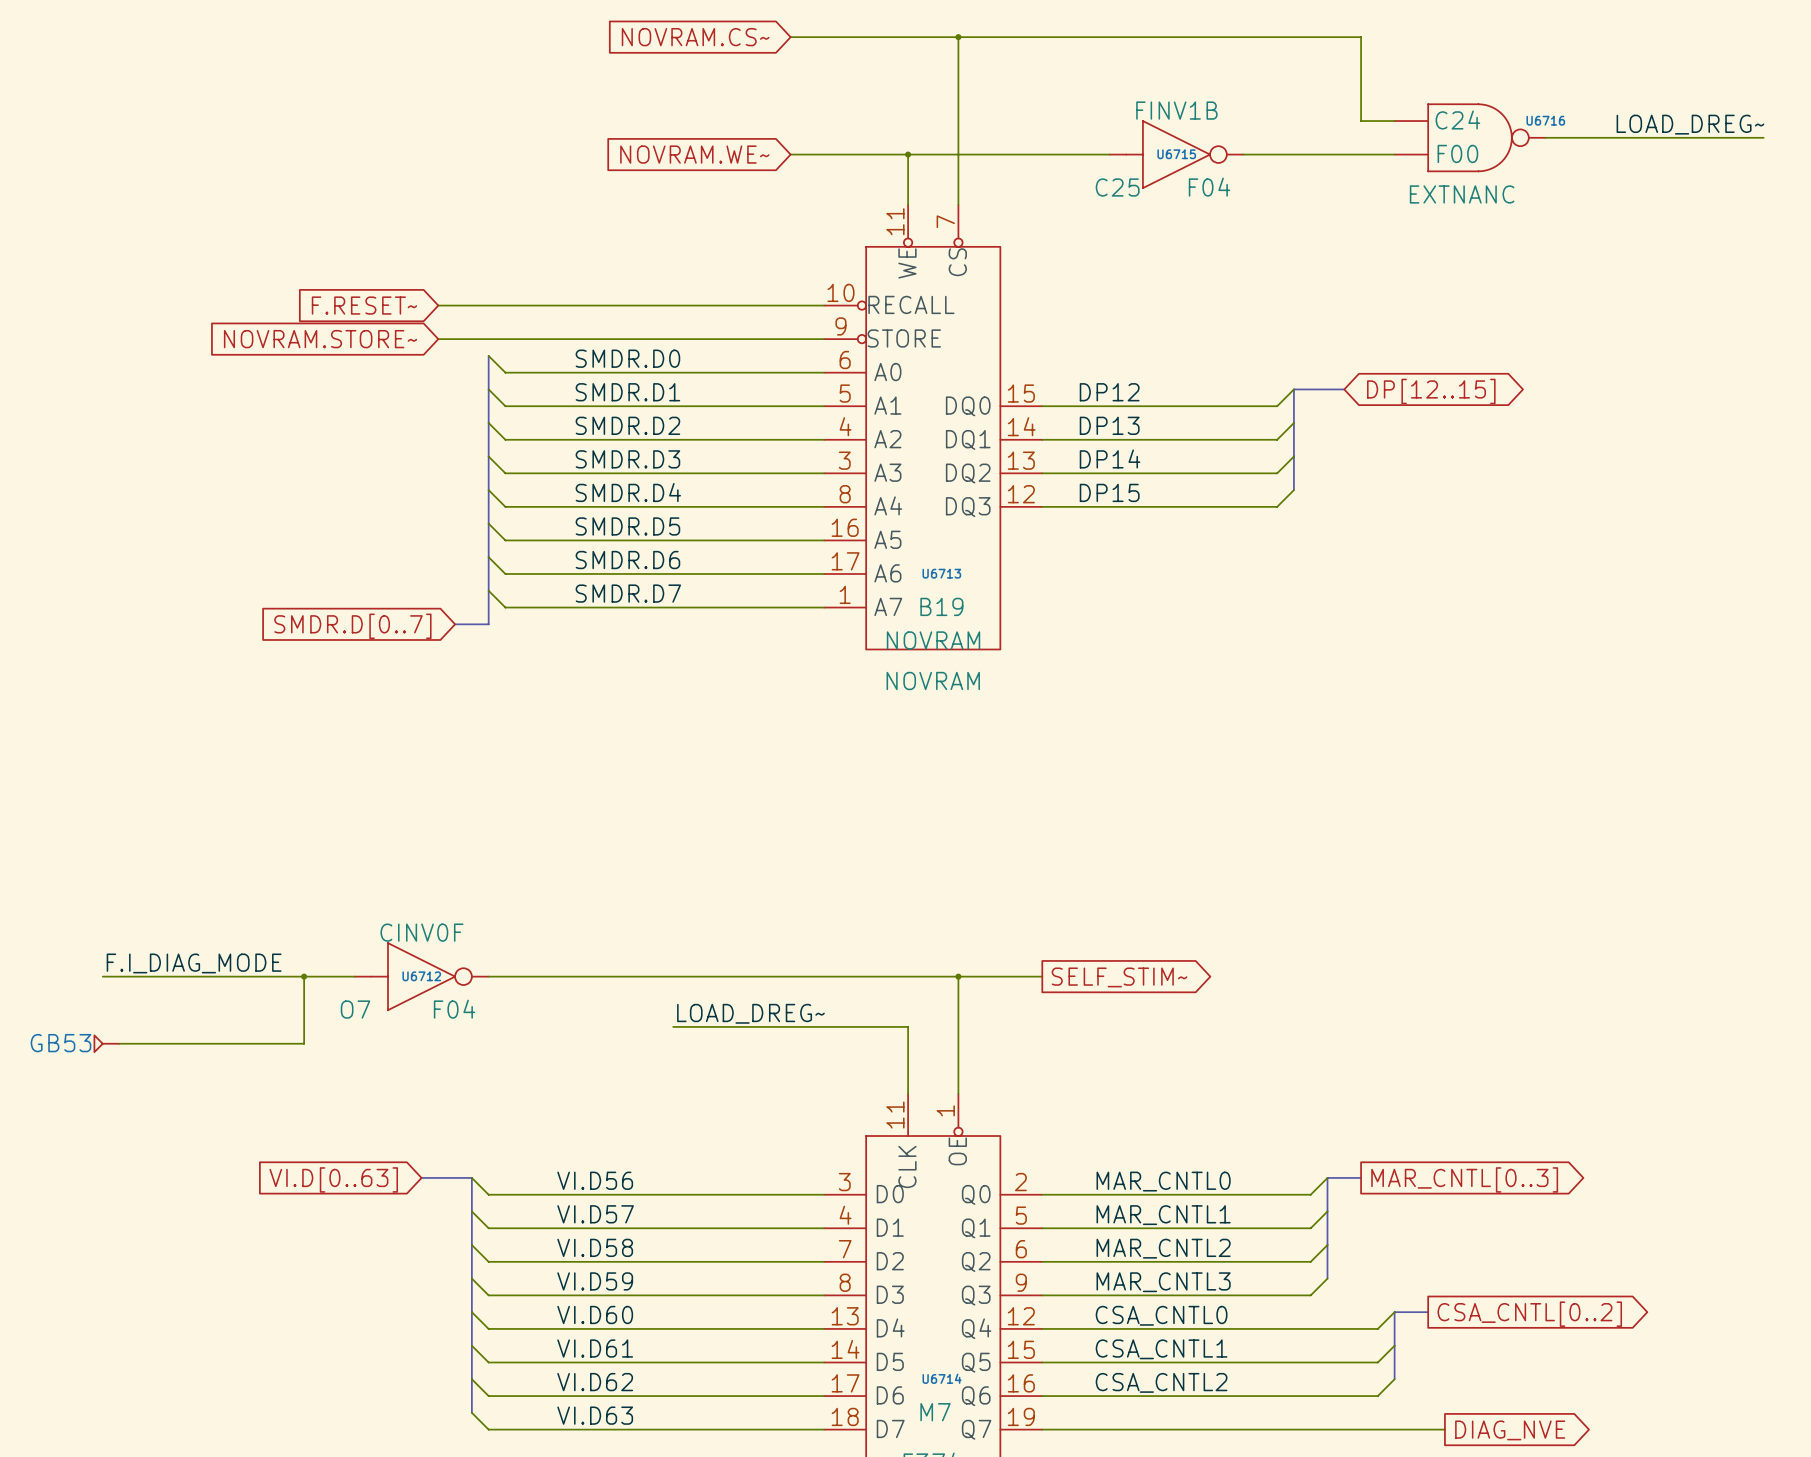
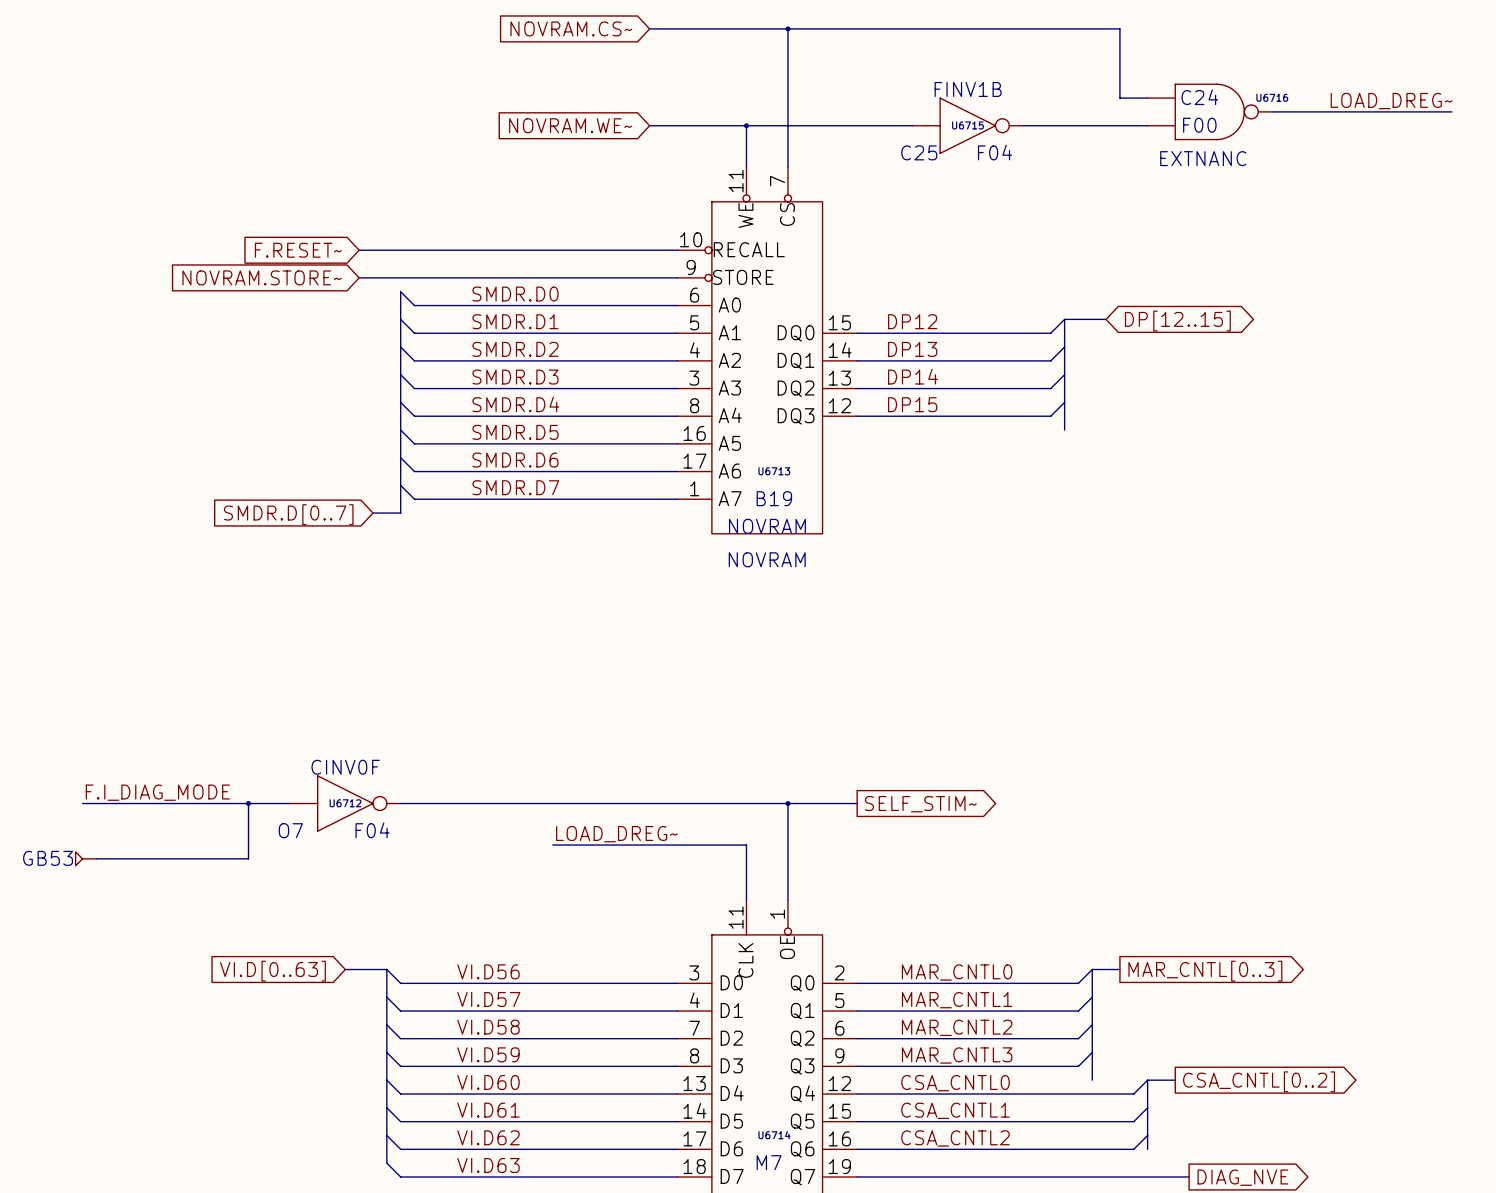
bus: none -> (1064, 402) (1064, 430)
bus: none -> (1092, 1052) (1092, 1080)
bus: none -> (1147, 1135) (1147, 1149)

